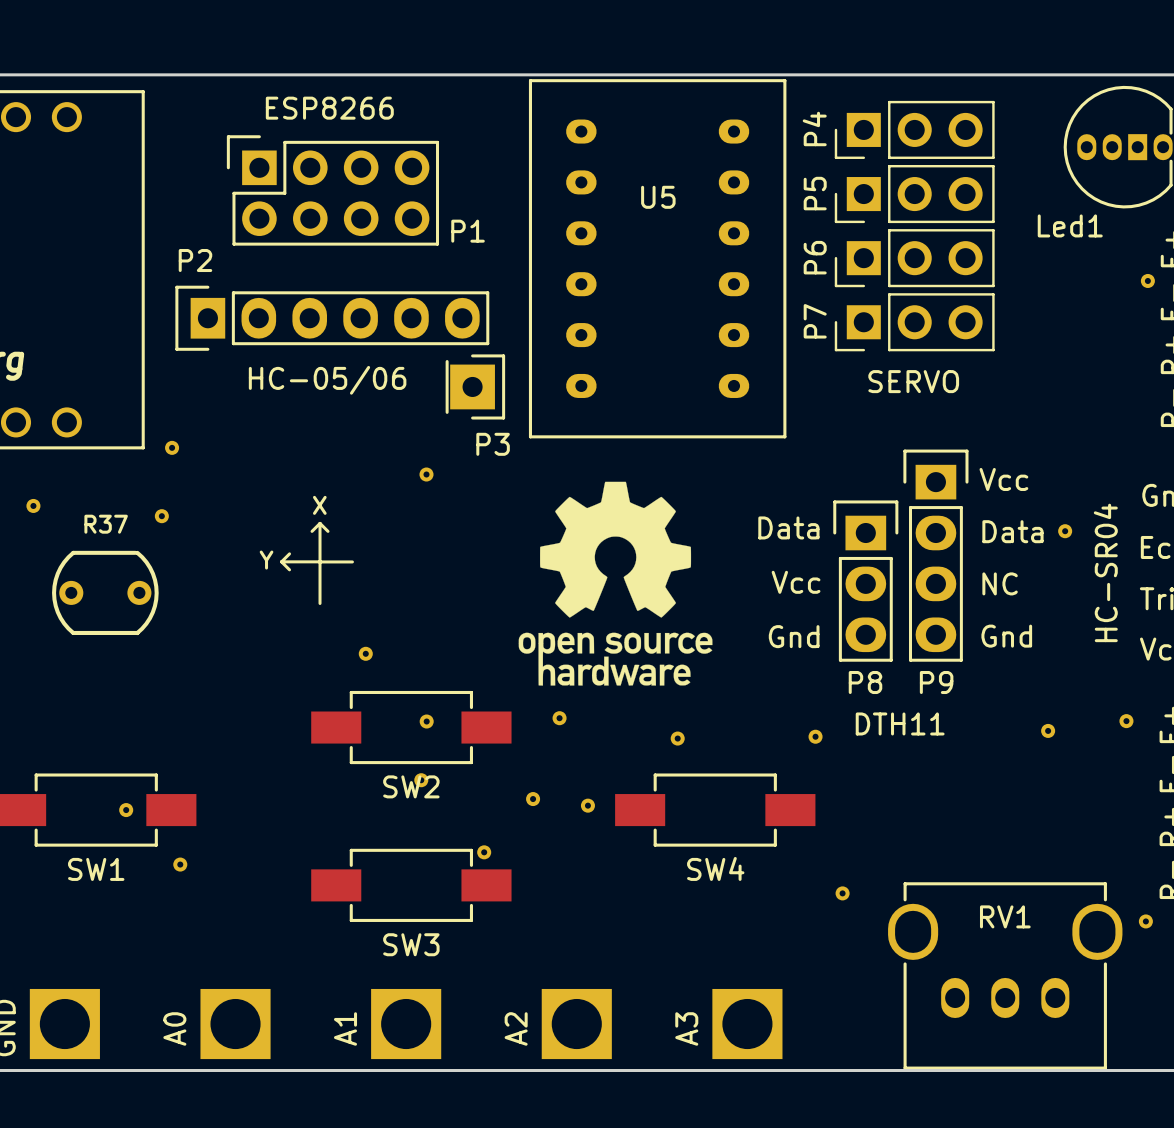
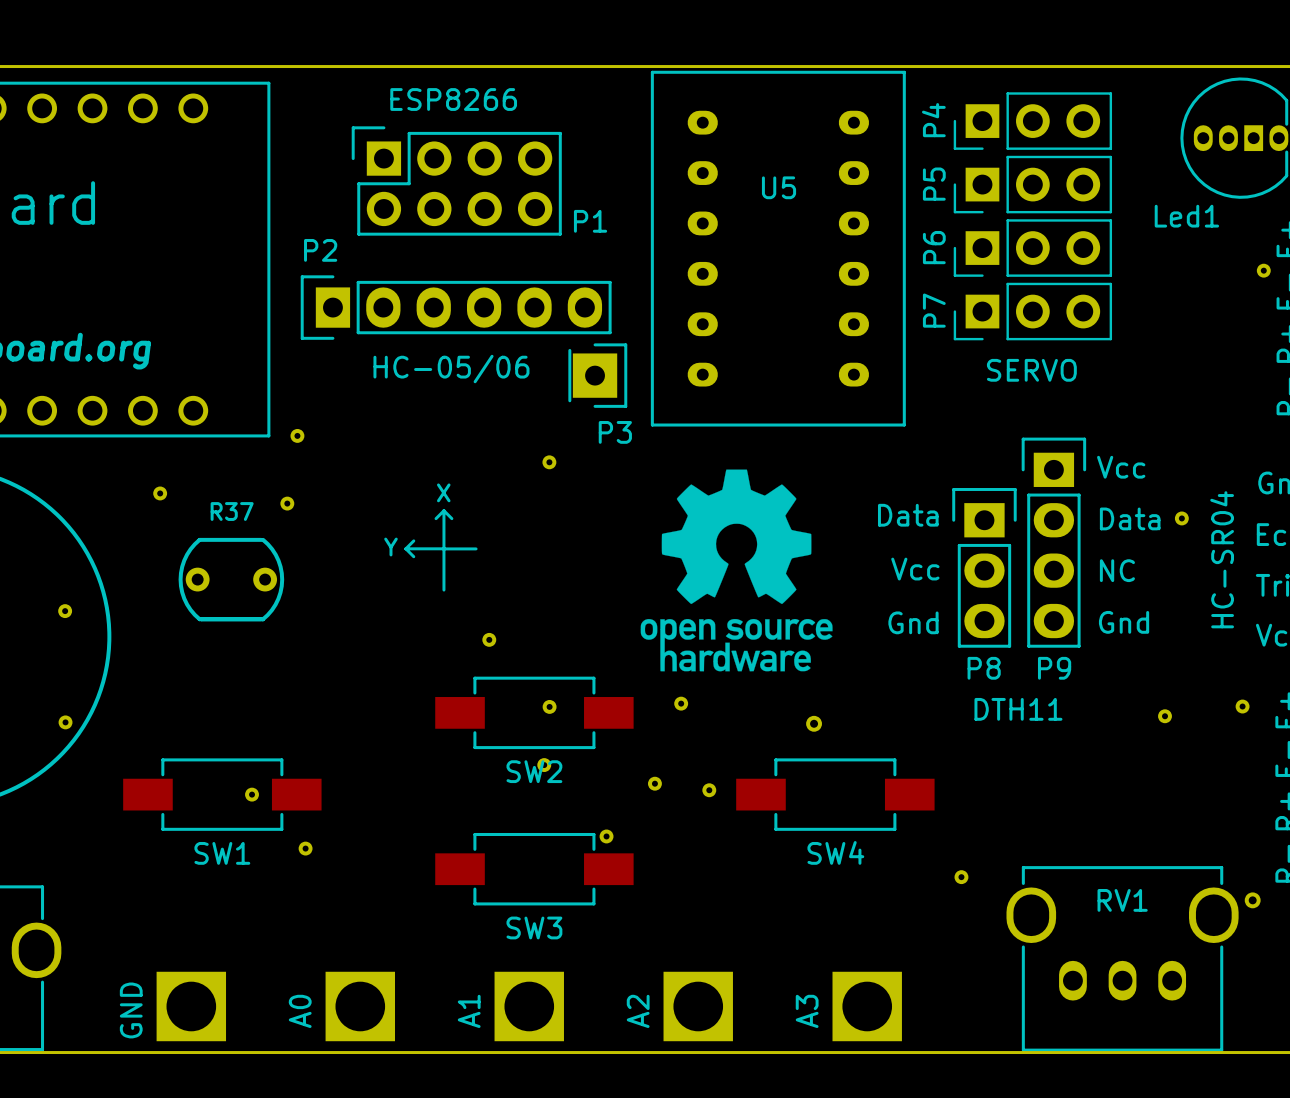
part footprint: [670, 731, 685, 746] -> [806, 715, 822, 732]
part: (815, 736) -> none
part footprint: [1138, 914, 1153, 929] -> [1244, 892, 1261, 909]

